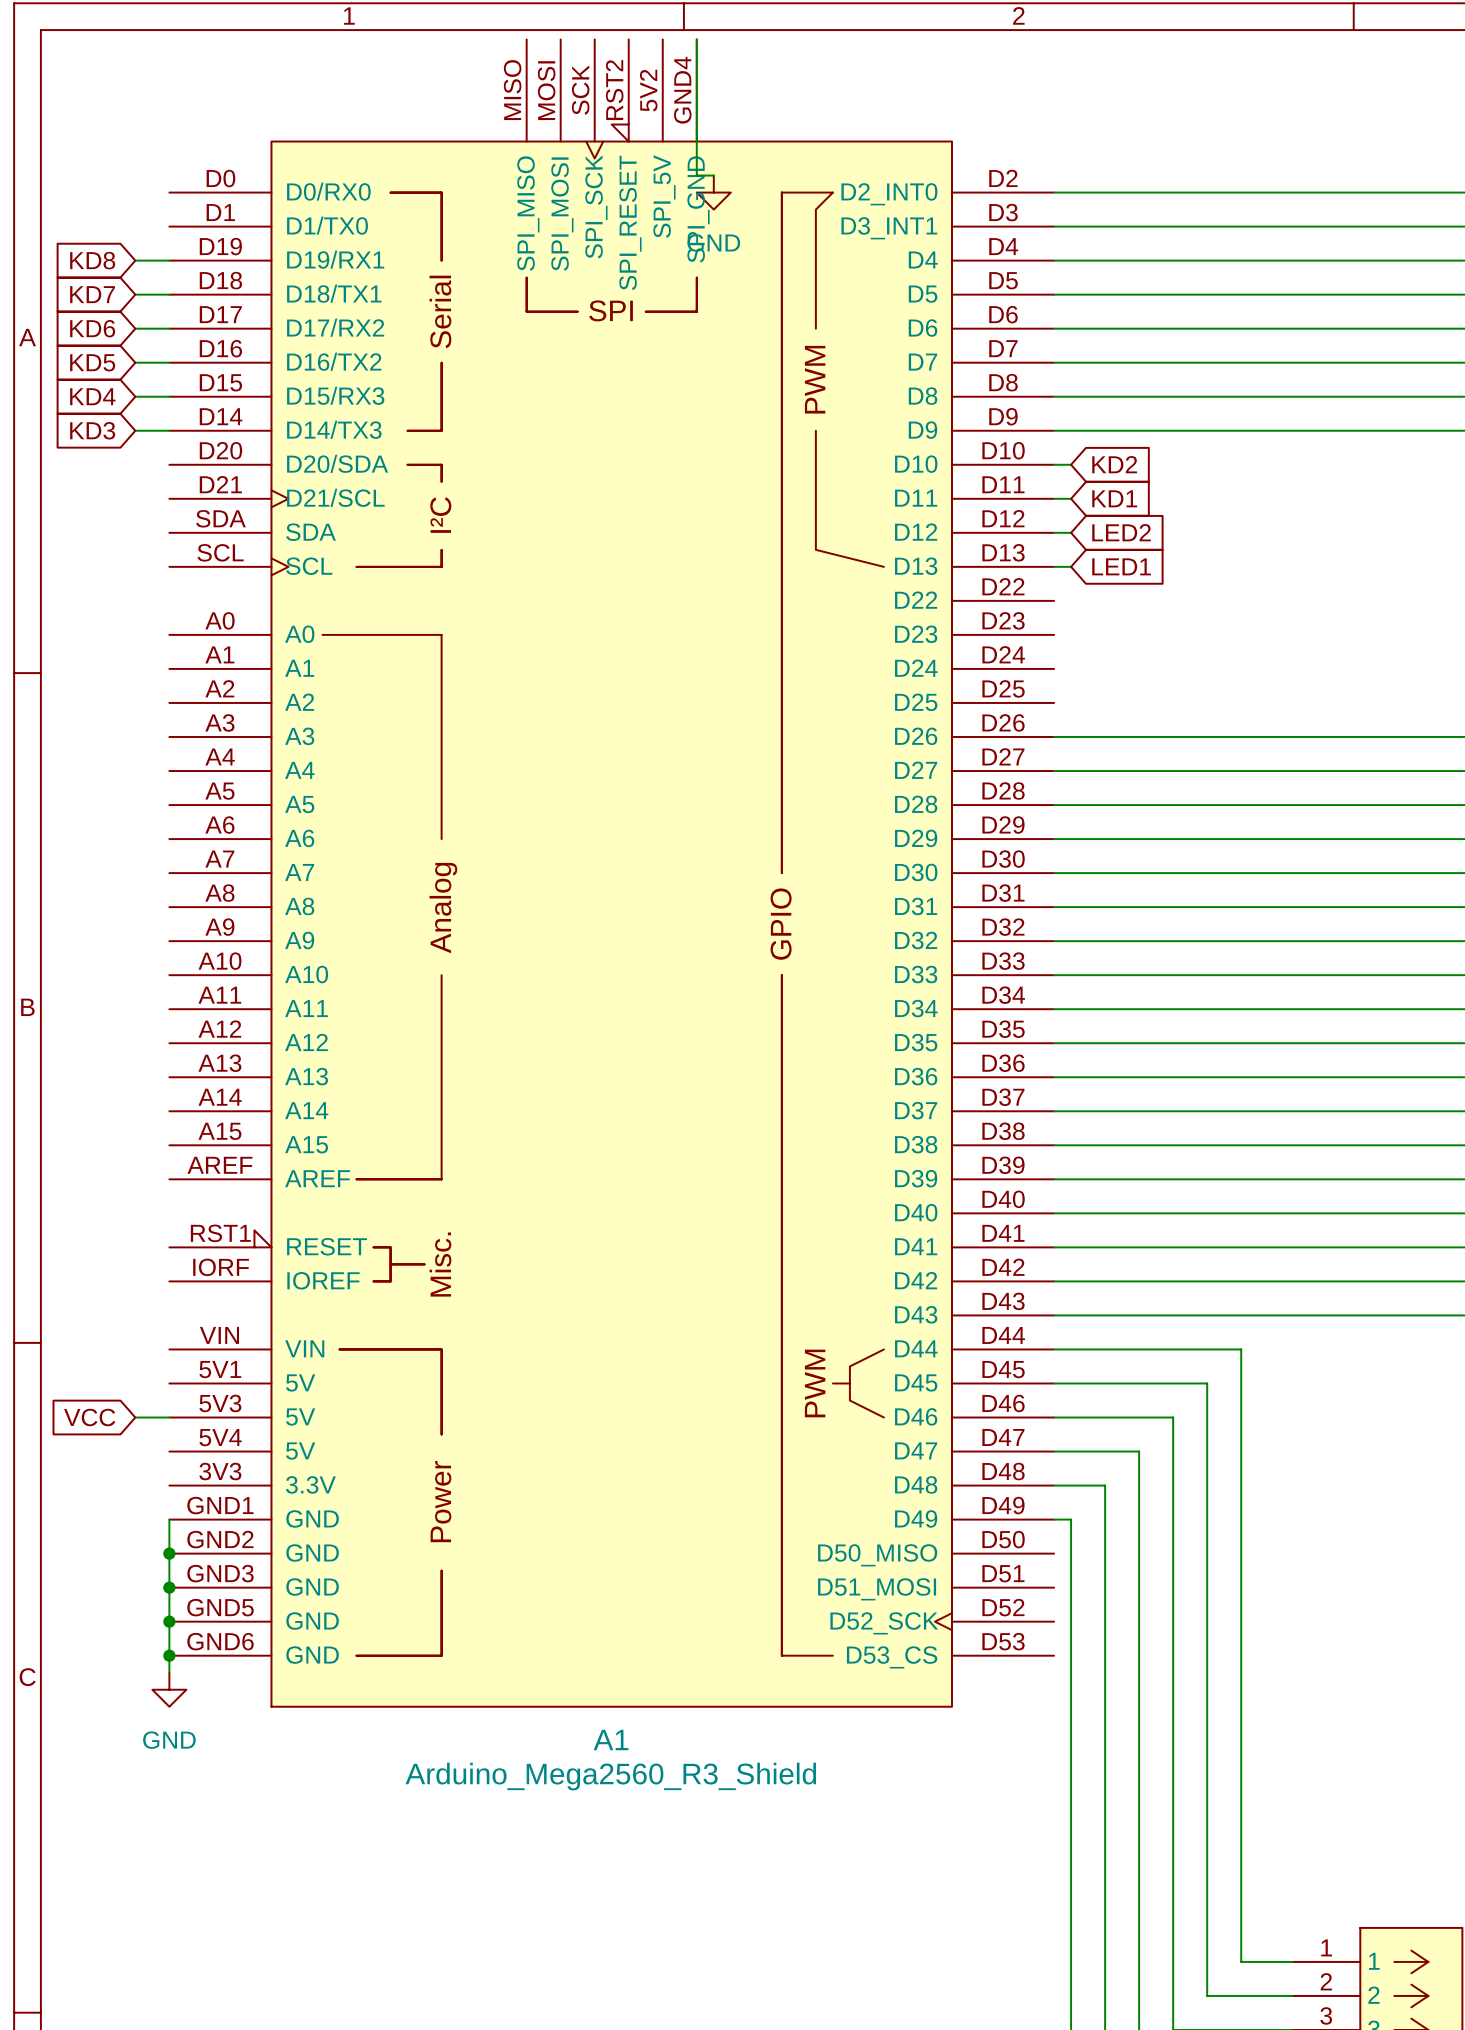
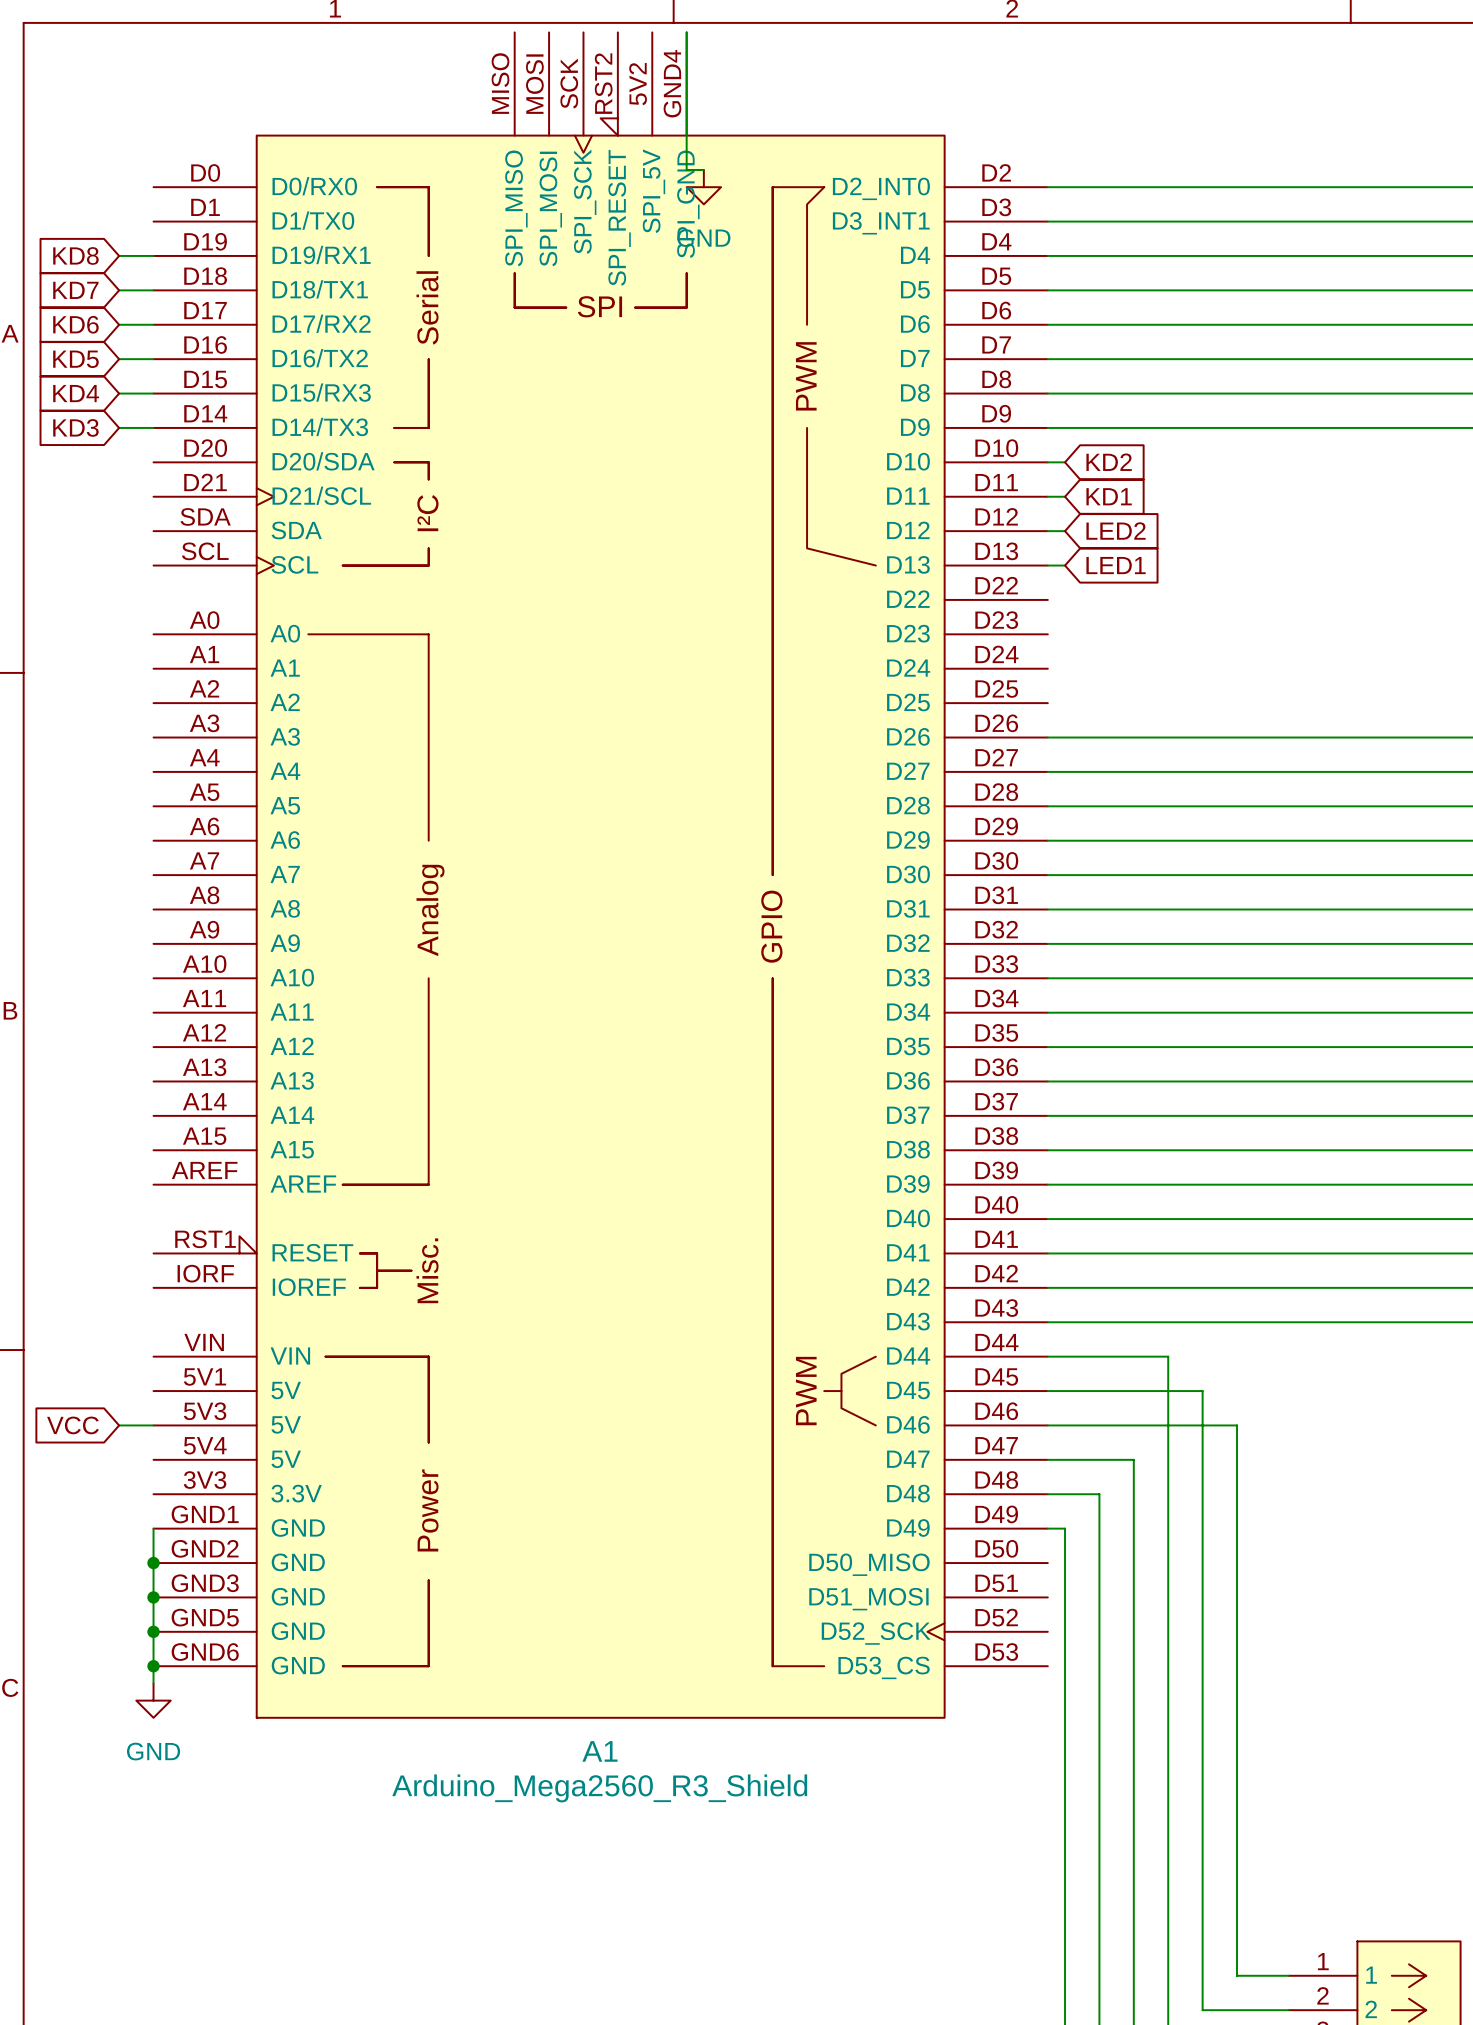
wire: (1173, 1349) (1241, 1349) (1241, 1417) -> (1168, 1356) (1168, 1425) (1237, 1425)

